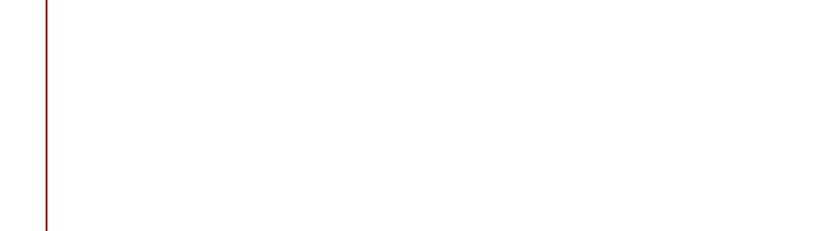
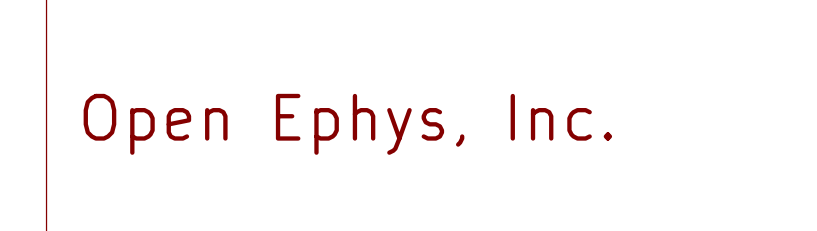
title block: none -> Open Ephys, Inc. (347, 124)

